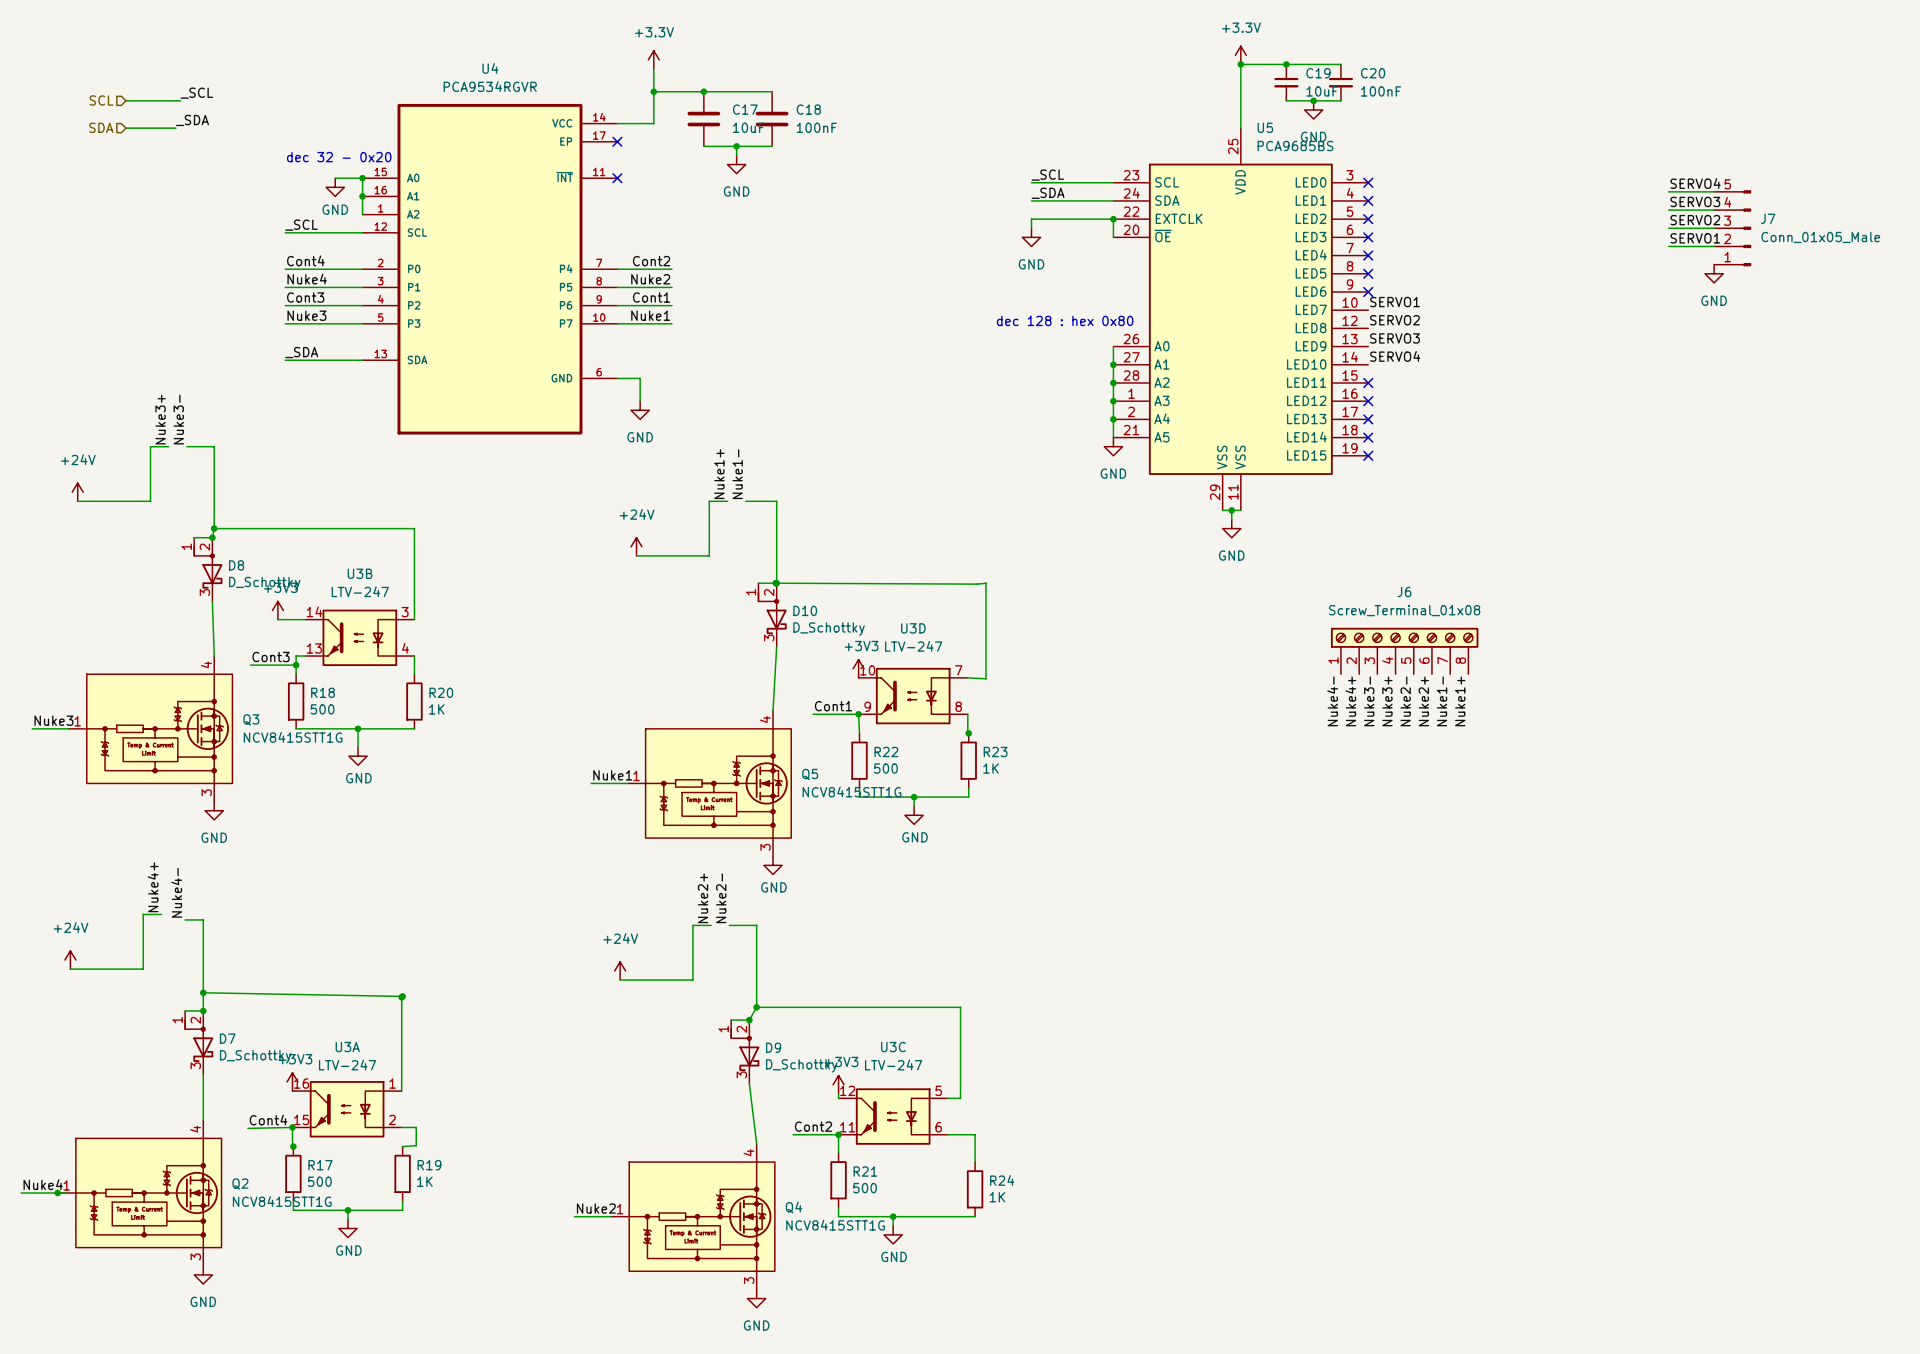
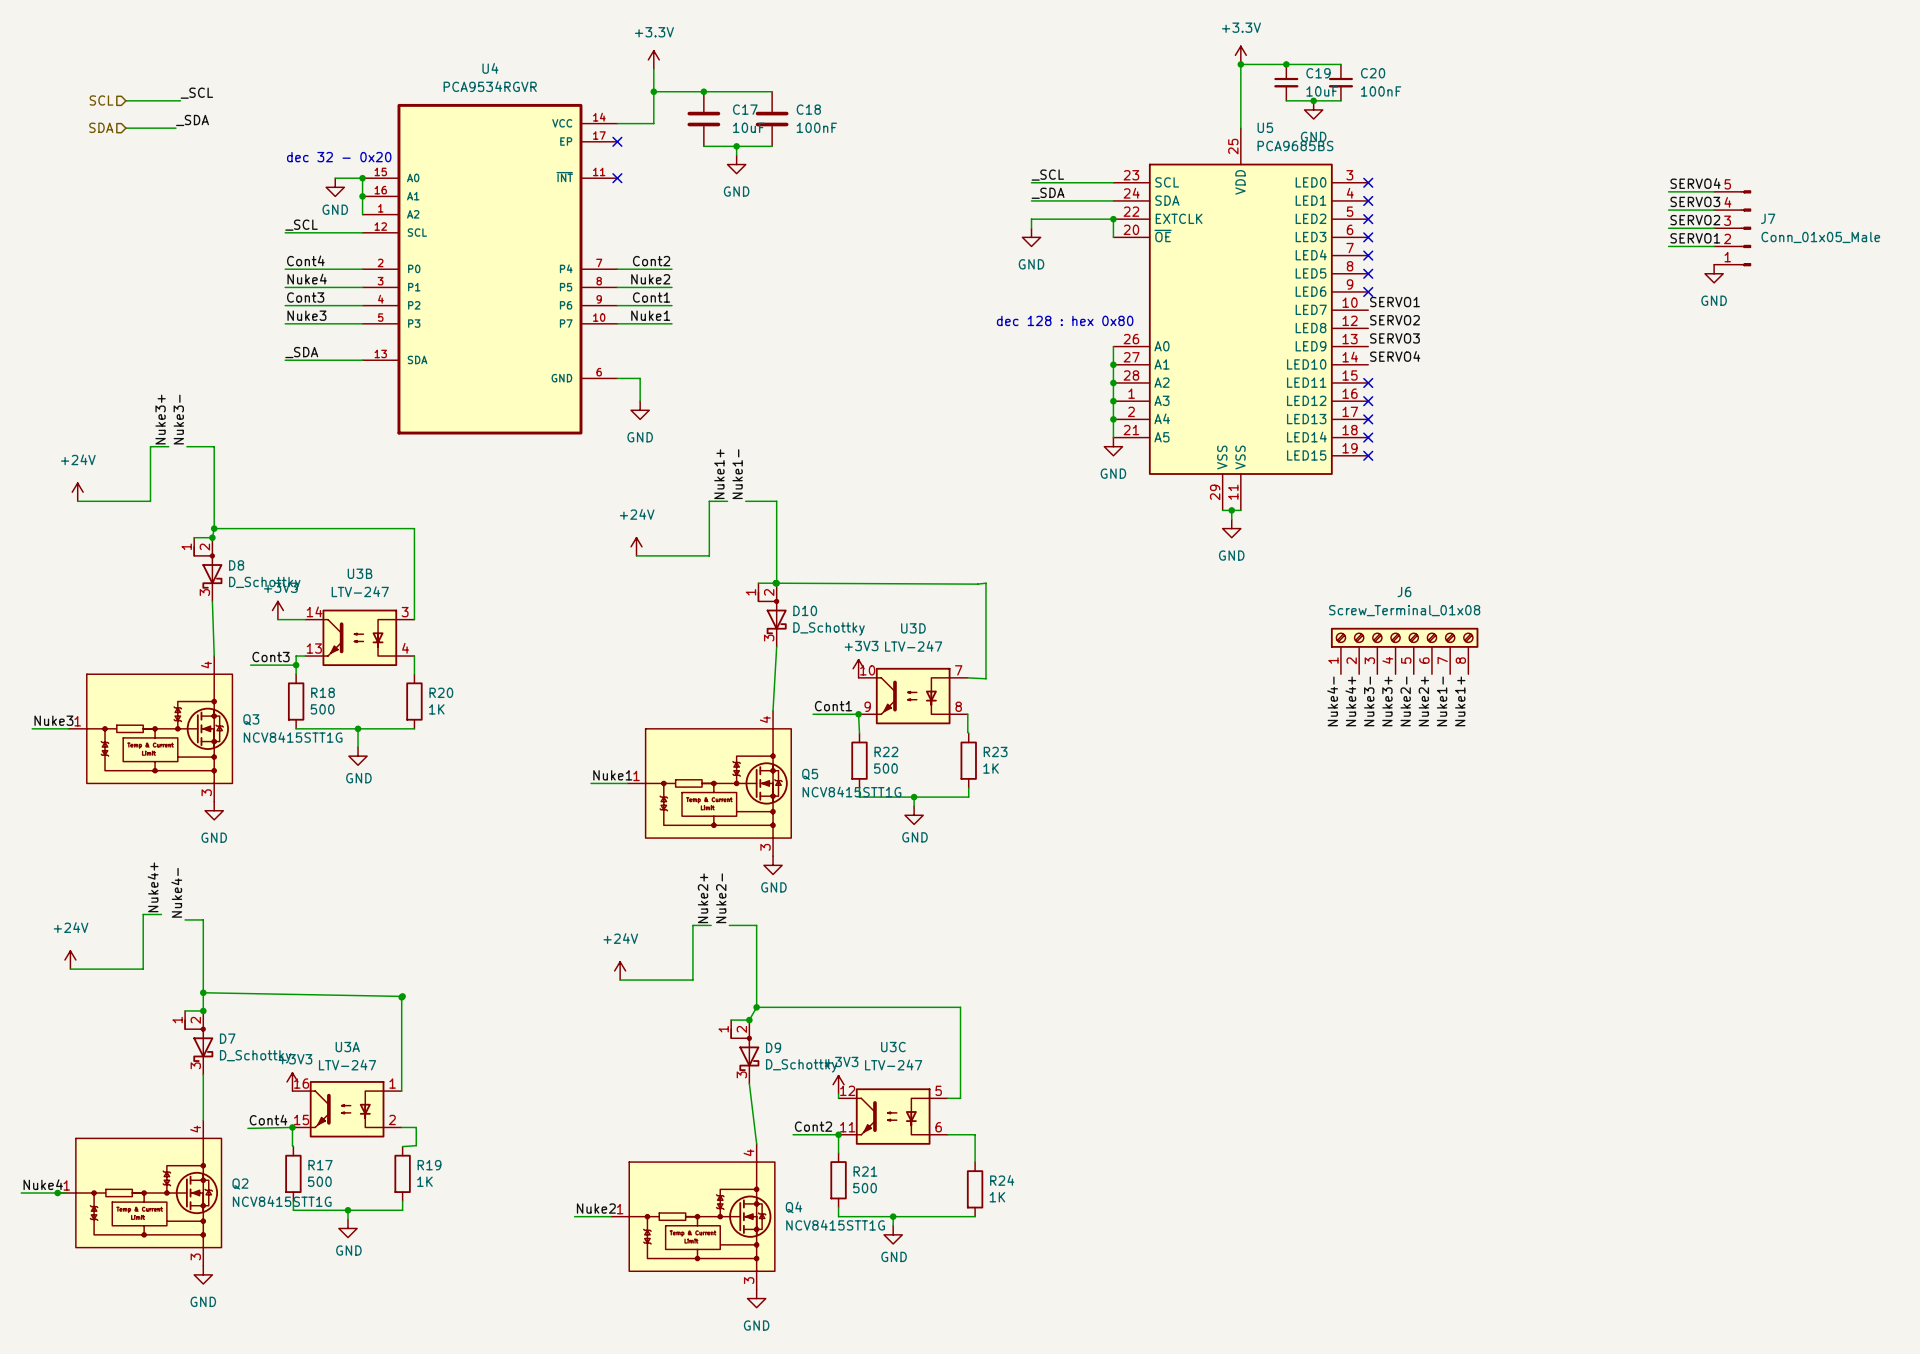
junction: (968, 733) -> none
junction: (293, 1146) -> none

